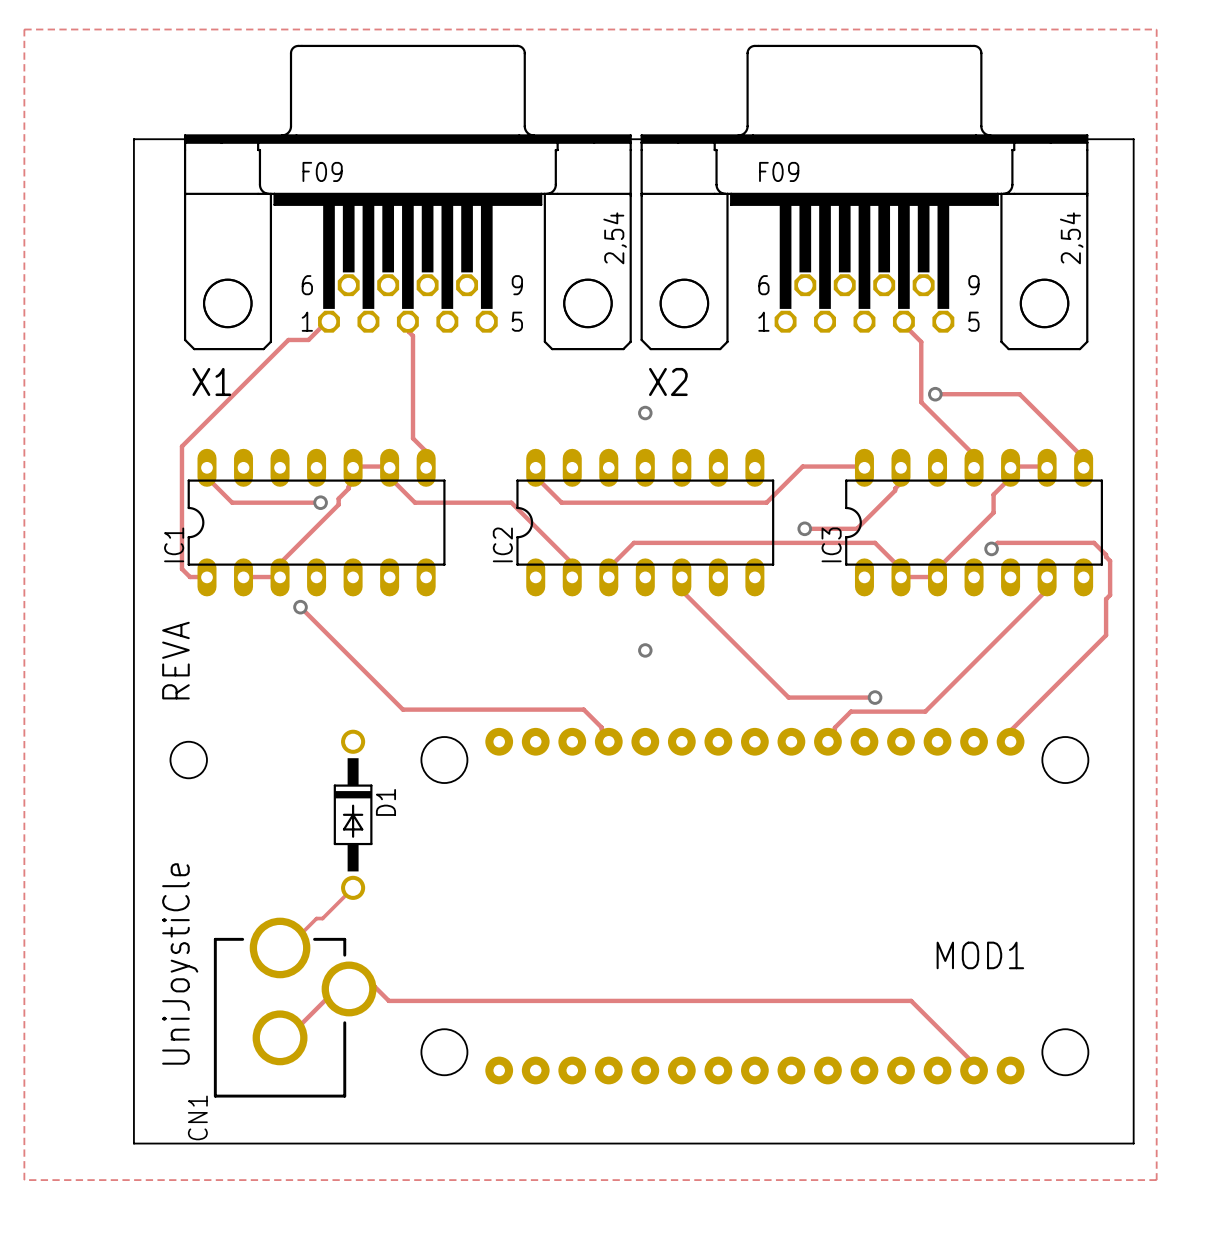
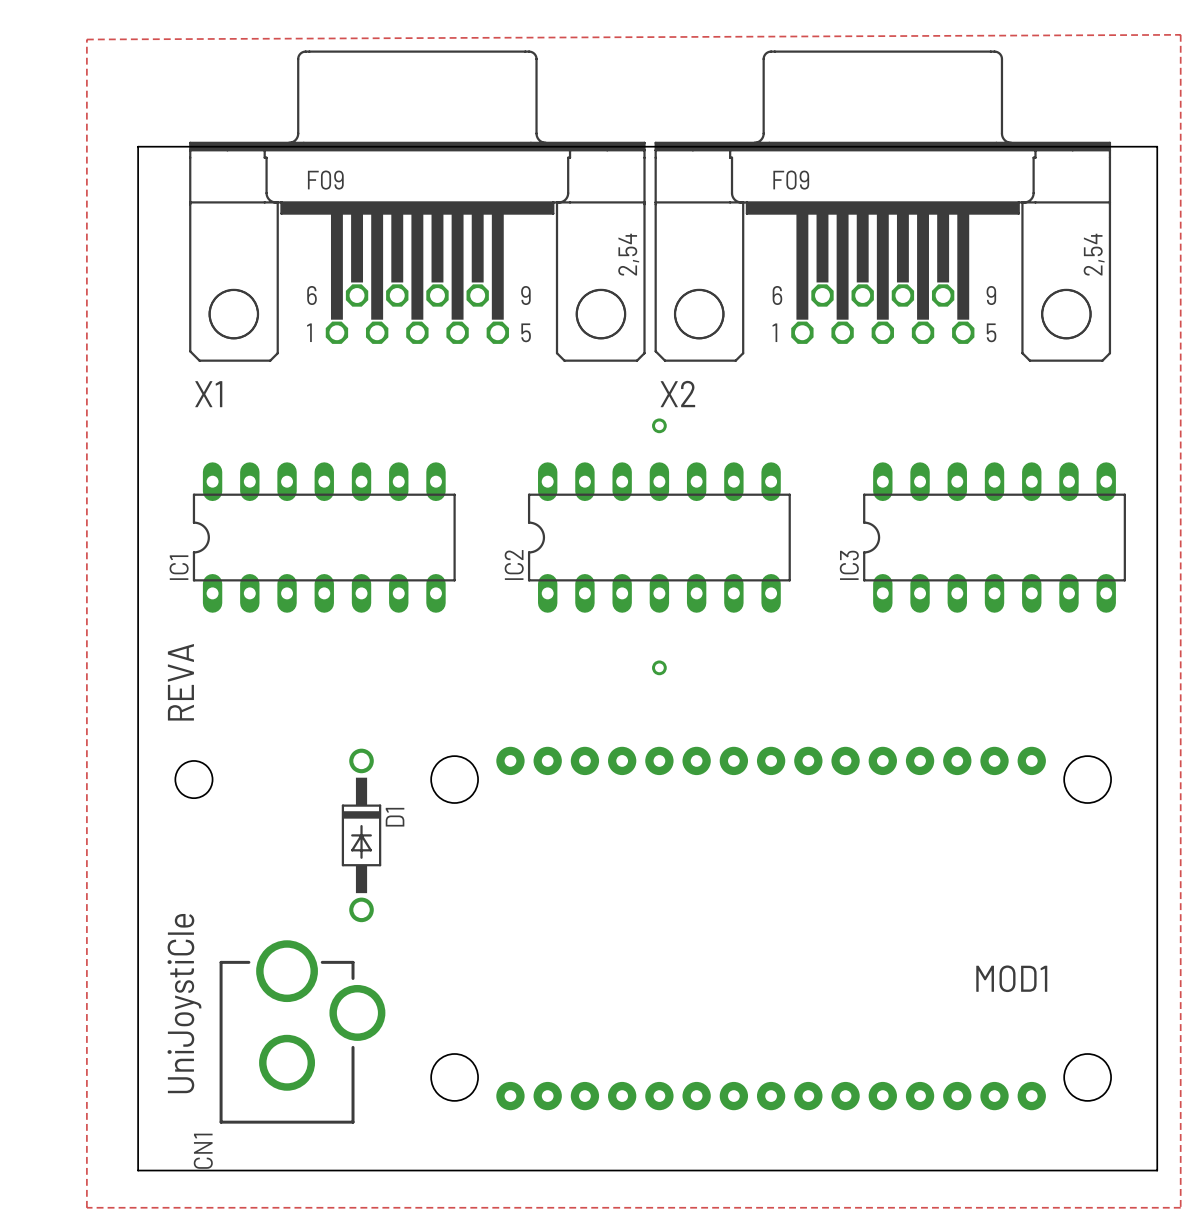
zone outline: (1156, 29) (24, 29) (24, 1180) (83, 1180) -> (1180, 34) (86, 39) (86, 1207)
track: (328, 321) (328, 319) (308, 339) (288, 339) (181, 446) (181, 568) (190, 577) (206, 577) -> none
track: (407, 321) (408, 331) (413, 335) (413, 438) (425, 450) (426, 467) -> none
track: (903, 321) (905, 325) (921, 341) (921, 402) (973, 454) (974, 467) -> none
track: (935, 394) (1019, 394) (1081, 456) (1083, 467) -> none
via: (935, 394) -> none
track: (206, 467) (208, 478) (232, 502) (320, 502) -> none
track: (535, 467) (537, 468) (537, 478) (561, 502) (766, 502) (802, 466) (864, 467) -> none
track: (900, 467) (899, 468) (899, 484) (895, 490) (856, 528) (804, 528) -> none
track: (1047, 467) (1011, 466) (1009, 468) (1009, 478) (993, 494) (993, 512) (937, 568) (937, 577) (899, 577) (899, 566) (875, 542) (633, 542) (609, 566) (608, 577) -> none
via: (320, 502) -> none
via: (804, 528) -> none
track: (991, 548) (997, 542) (1094, 542) (1110, 560) (1110, 595) (1106, 599) (1106, 635) (1011, 729) (1010, 741) -> none
via: (991, 548) -> none
track: (243, 577) (280, 577) (278, 564) (338, 504) (338, 498) (352, 482) (352, 468) (354, 466) (388, 466) (390, 468) (390, 478) (415, 502) (511, 502) (571, 562) (572, 577) -> none
track: (681, 577) (682, 591) (788, 697) (875, 697) -> none
track: (1047, 577) (1045, 591) (925, 711) (850, 711) (834, 727) (828, 735) (827, 741) -> none
track: (300, 607) (402, 709) (583, 709) (601, 727) (607, 735) (608, 741) -> none
via: (300, 607) -> none
via: (875, 697) -> none
track: (353, 887) (322, 918) (316, 918) (288, 946) (280, 947) -> none
track: (280, 1037) (288, 1037) (334, 990) (348, 990) (352, 986) (374, 986) (388, 1000) (911, 1000) (973, 1063) (974, 1070) -> none

